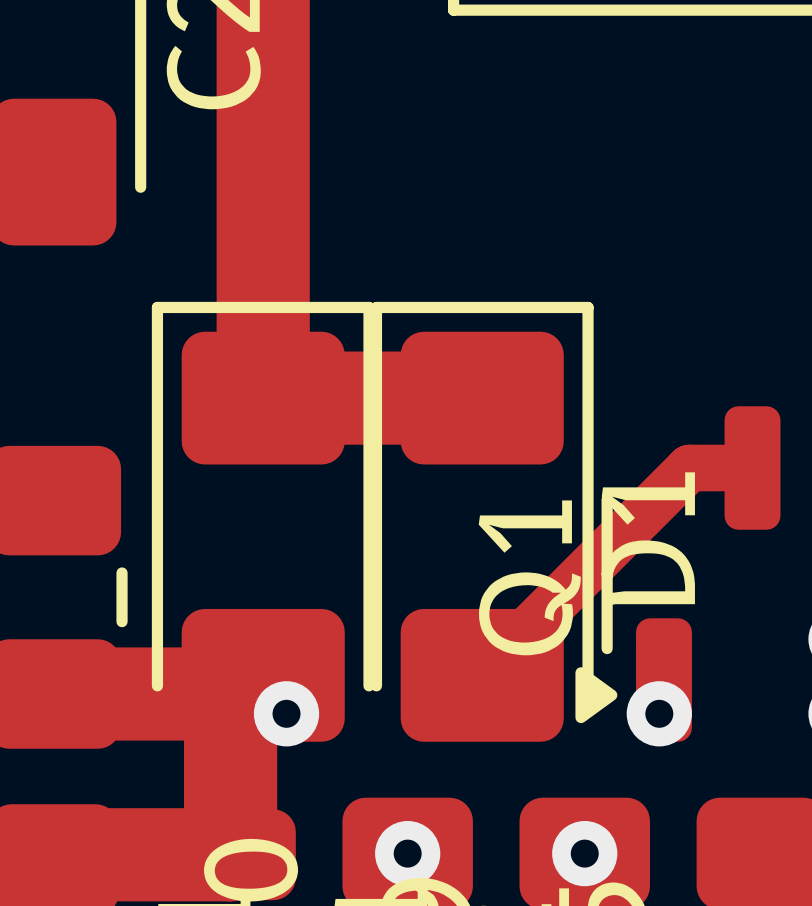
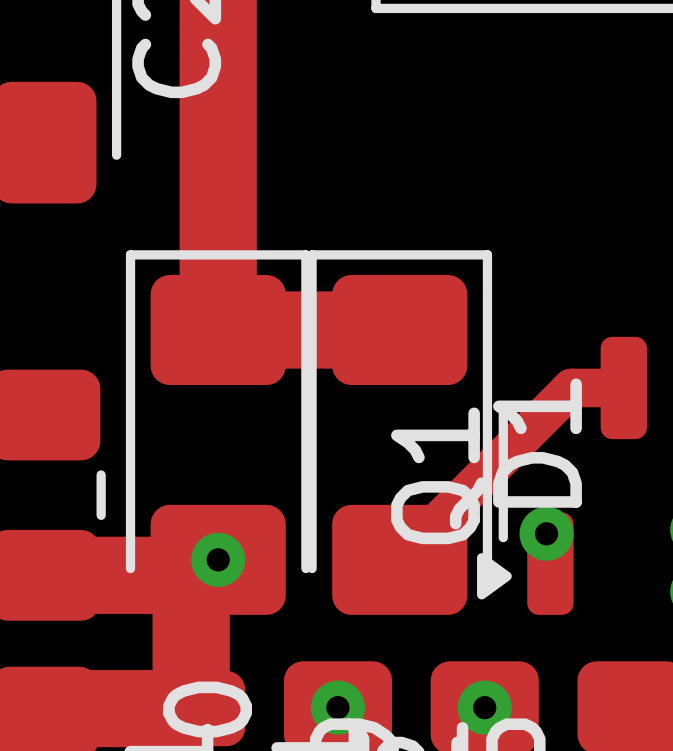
via position: (286, 713) -> (218, 559)
via position: (659, 713) -> (546, 533)

